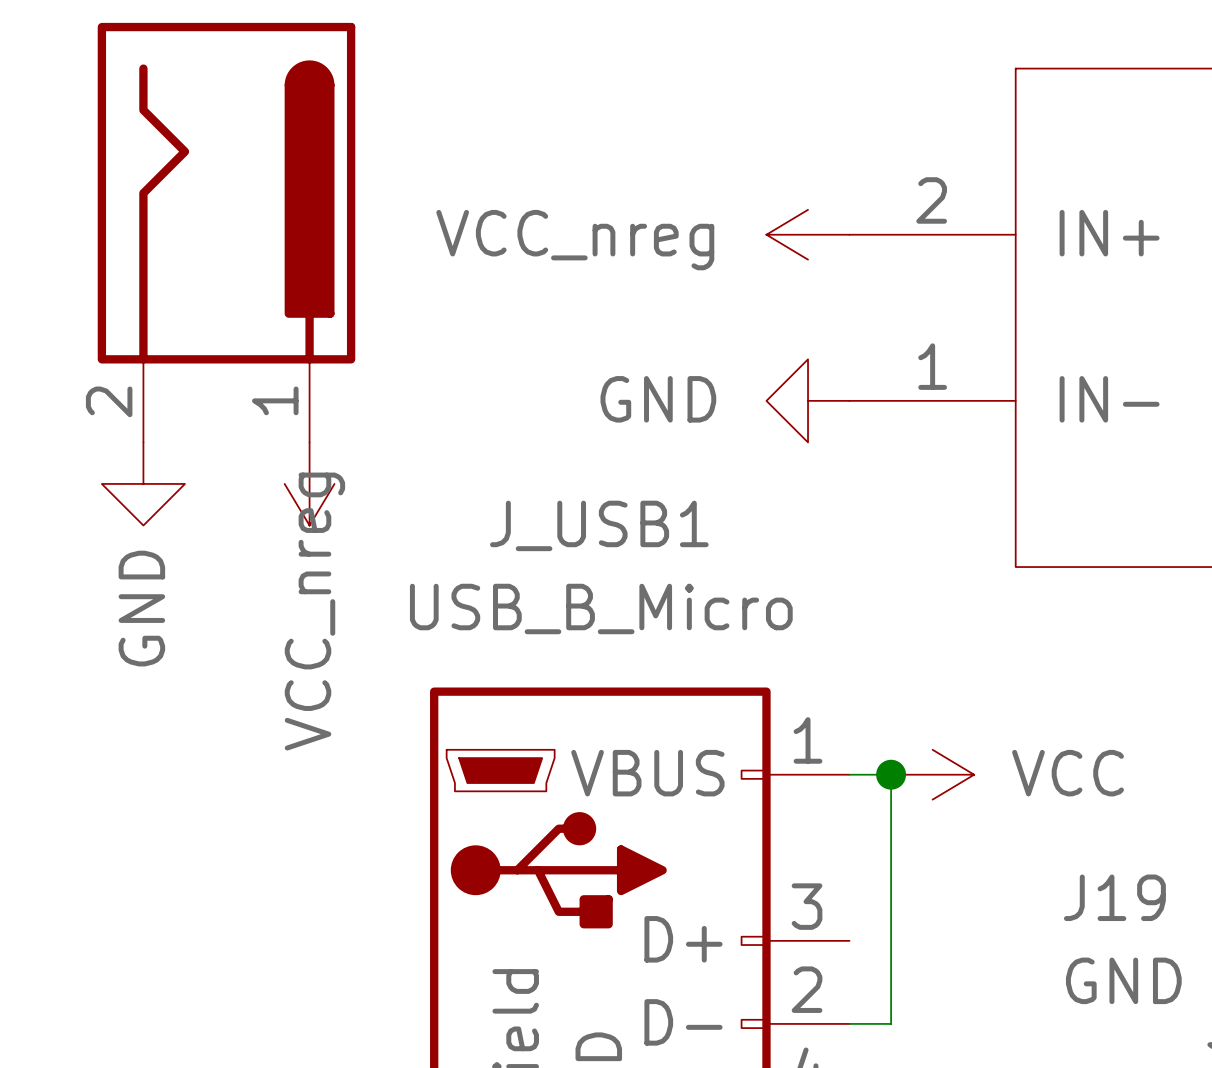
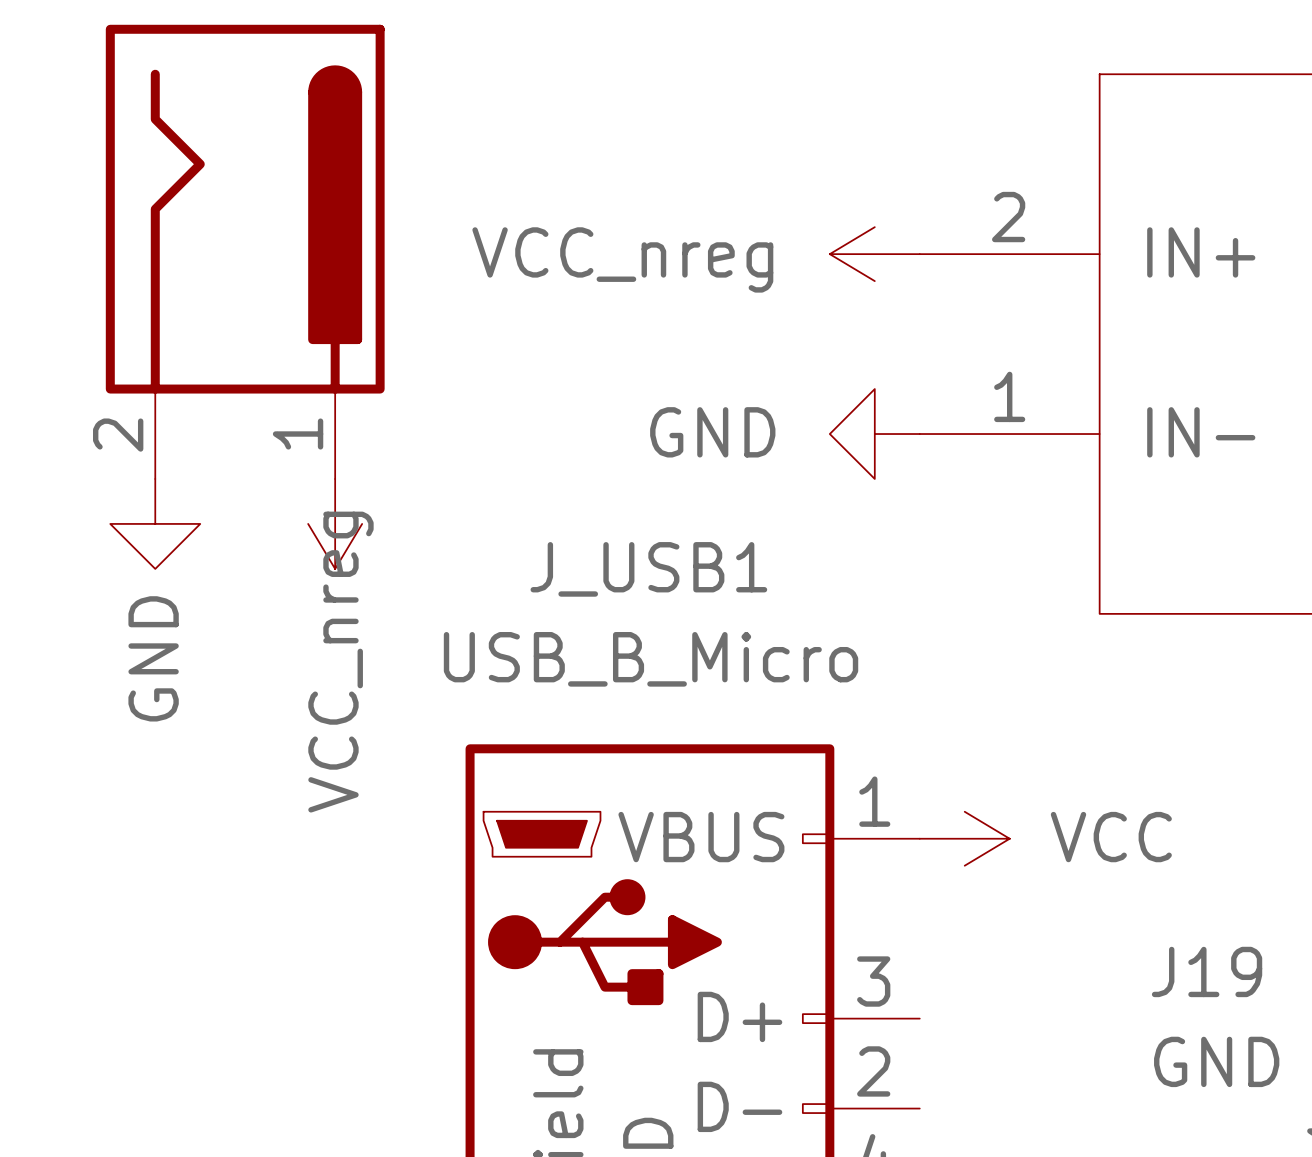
wire: (849, 774) (891, 774) (891, 1023) (849, 1023) -> none
junction: (891, 774) -> none
power symbol position: VCC (932, 774) -> VCC (964, 838)

